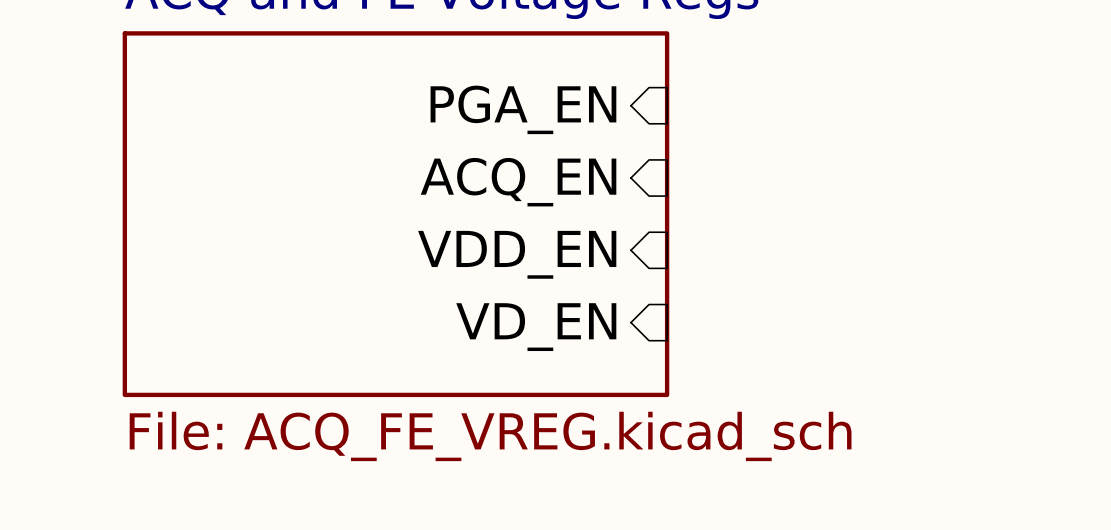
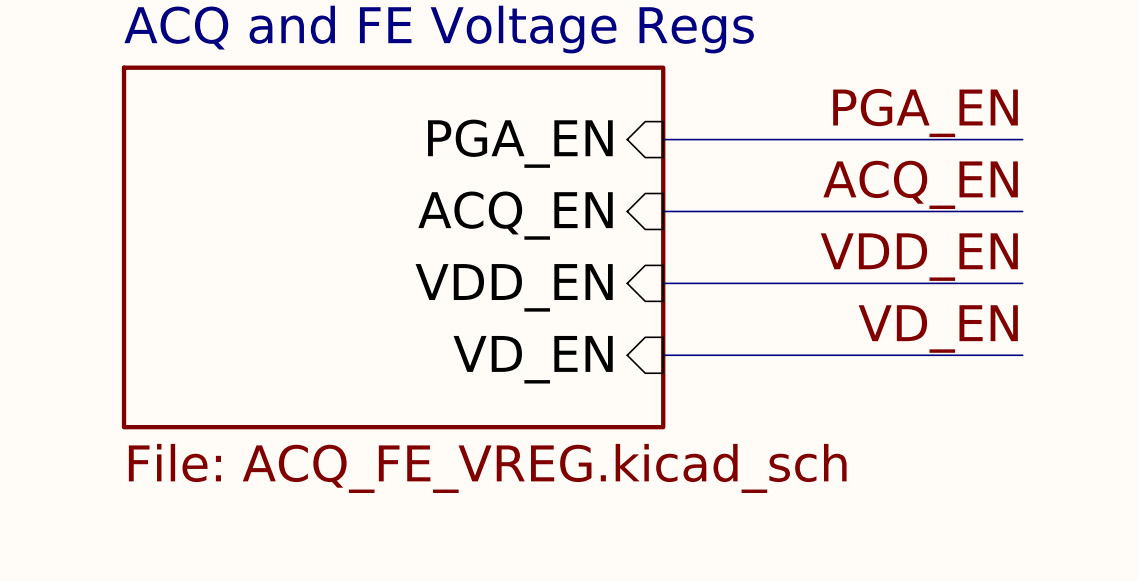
label: none -> PGA_EN (925, 113)
wire: none -> (663, 139) (1022, 139)
label: none -> ACQ_EN (920, 184)
wire: none -> (663, 211) (1022, 211)
label: none -> VDD_EN (919, 257)
wire: none -> (663, 283) (1022, 283)
label: none -> VD_EN (938, 329)
wire: none -> (663, 355) (1022, 355)

